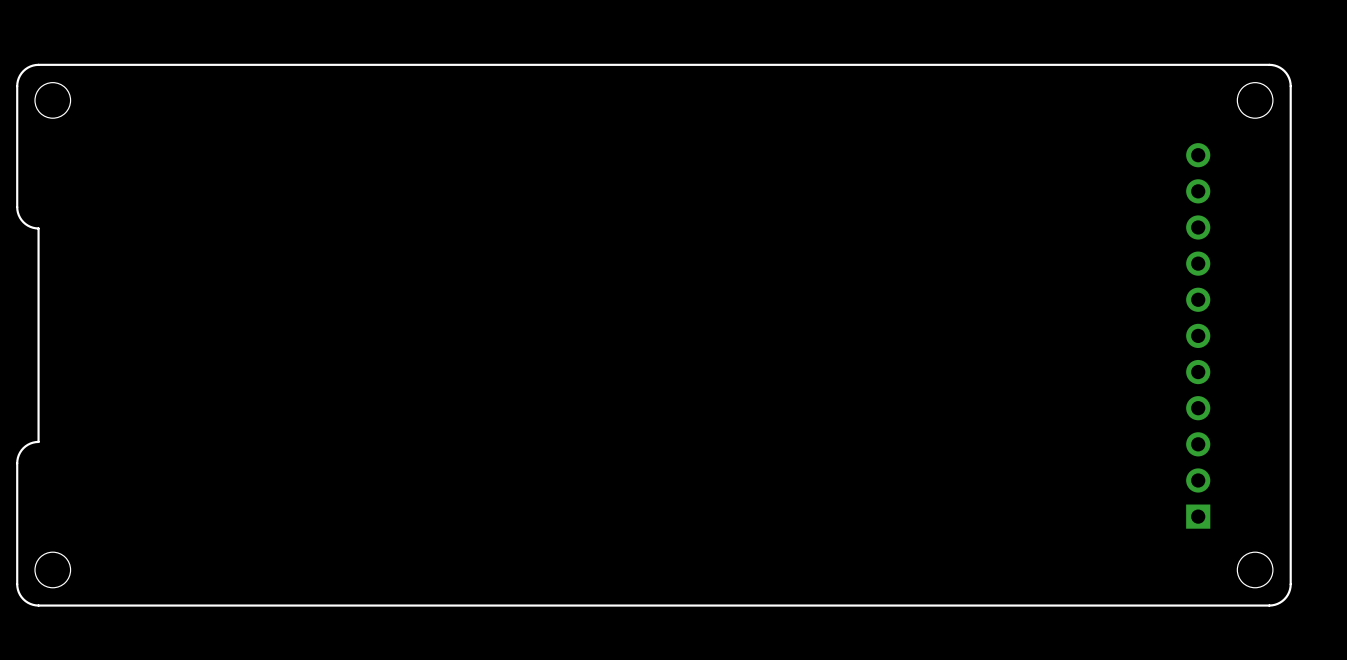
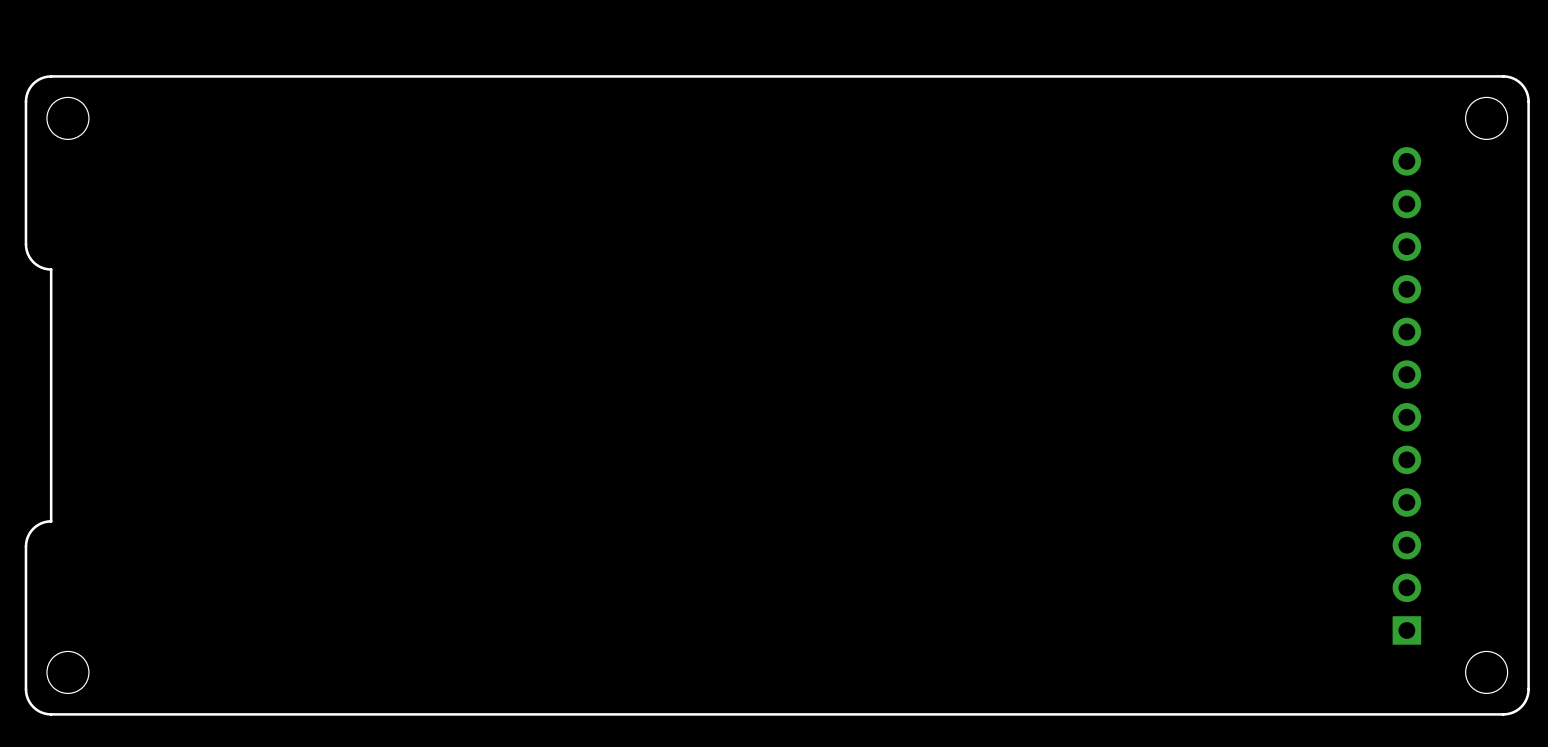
part footprint: [1186, 143, 1211, 529] -> [1392, 147, 1422, 645]

